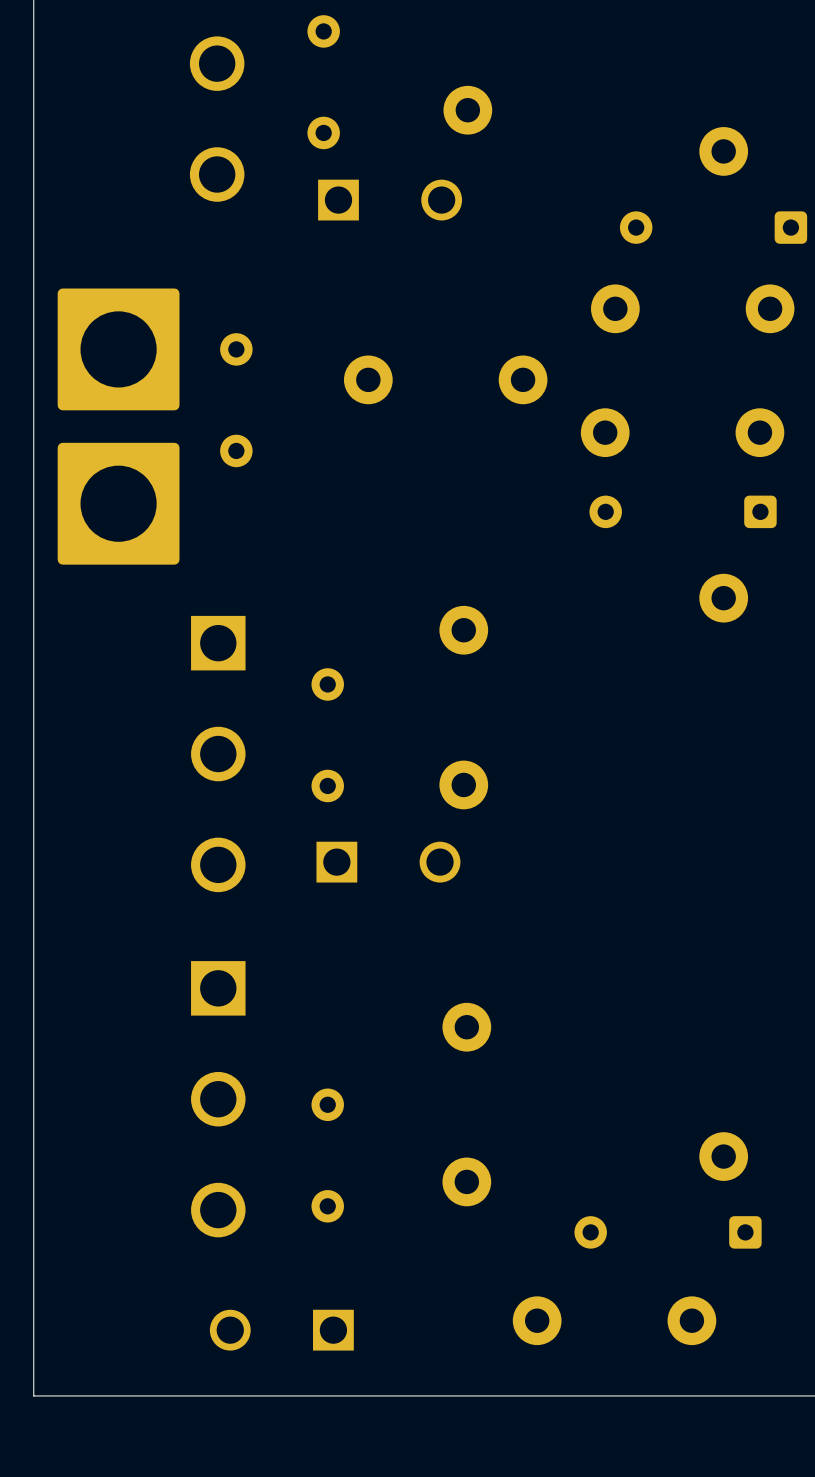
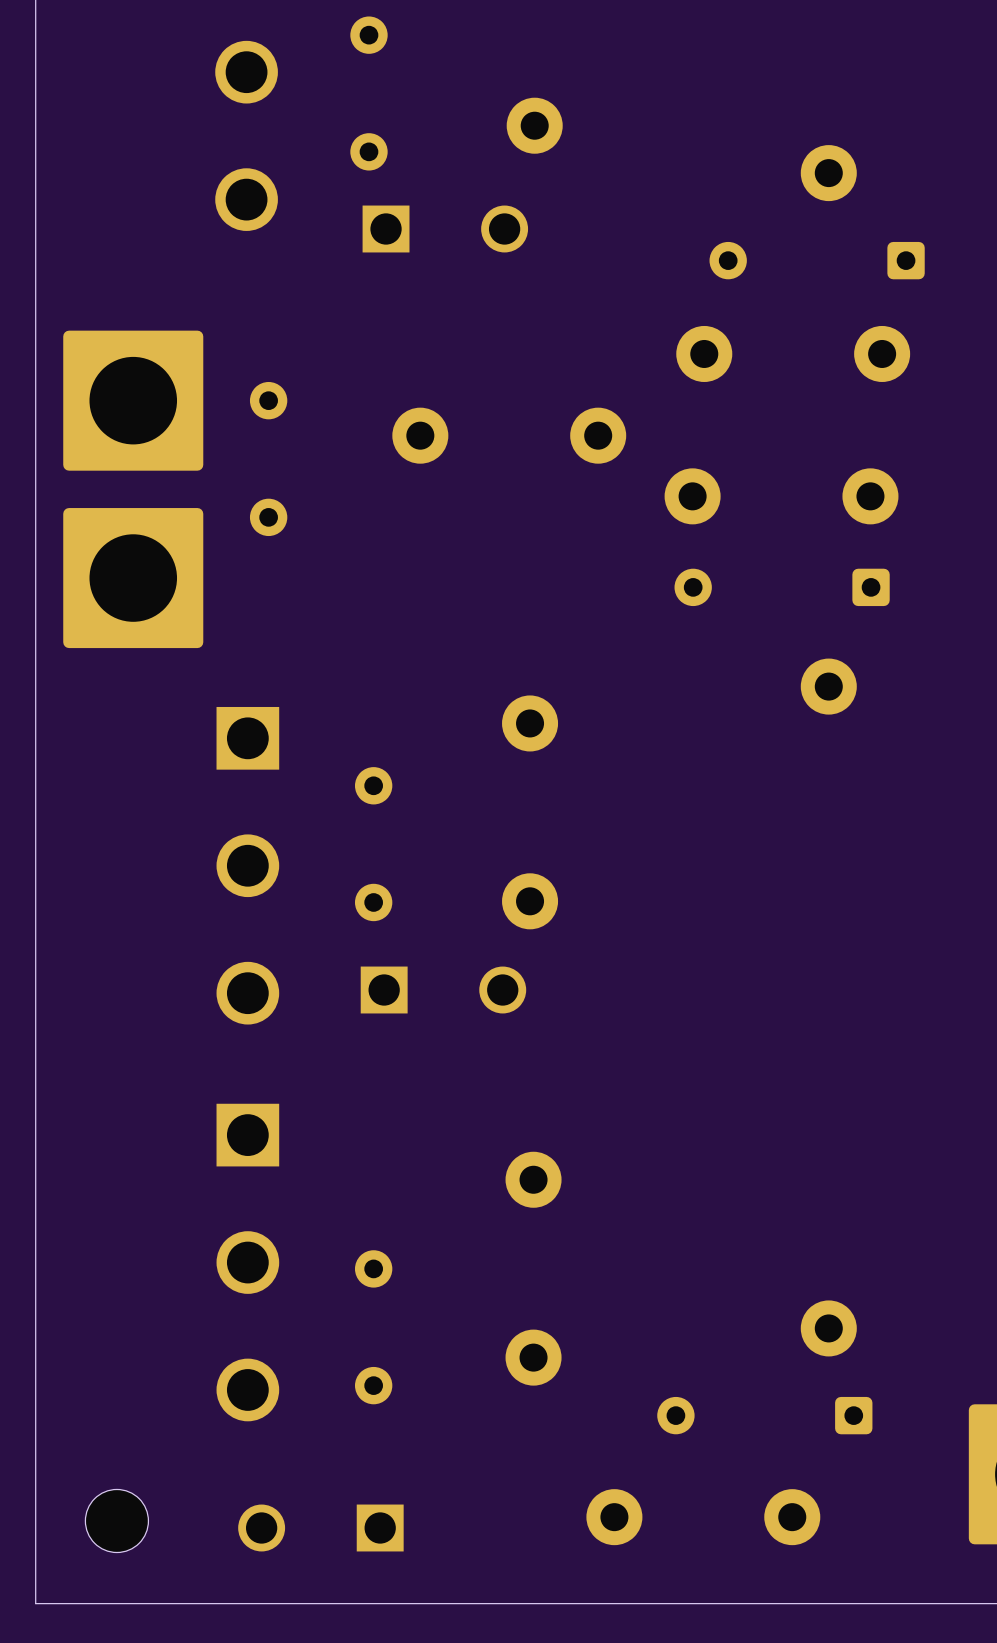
part: none -> (116, 1520)

